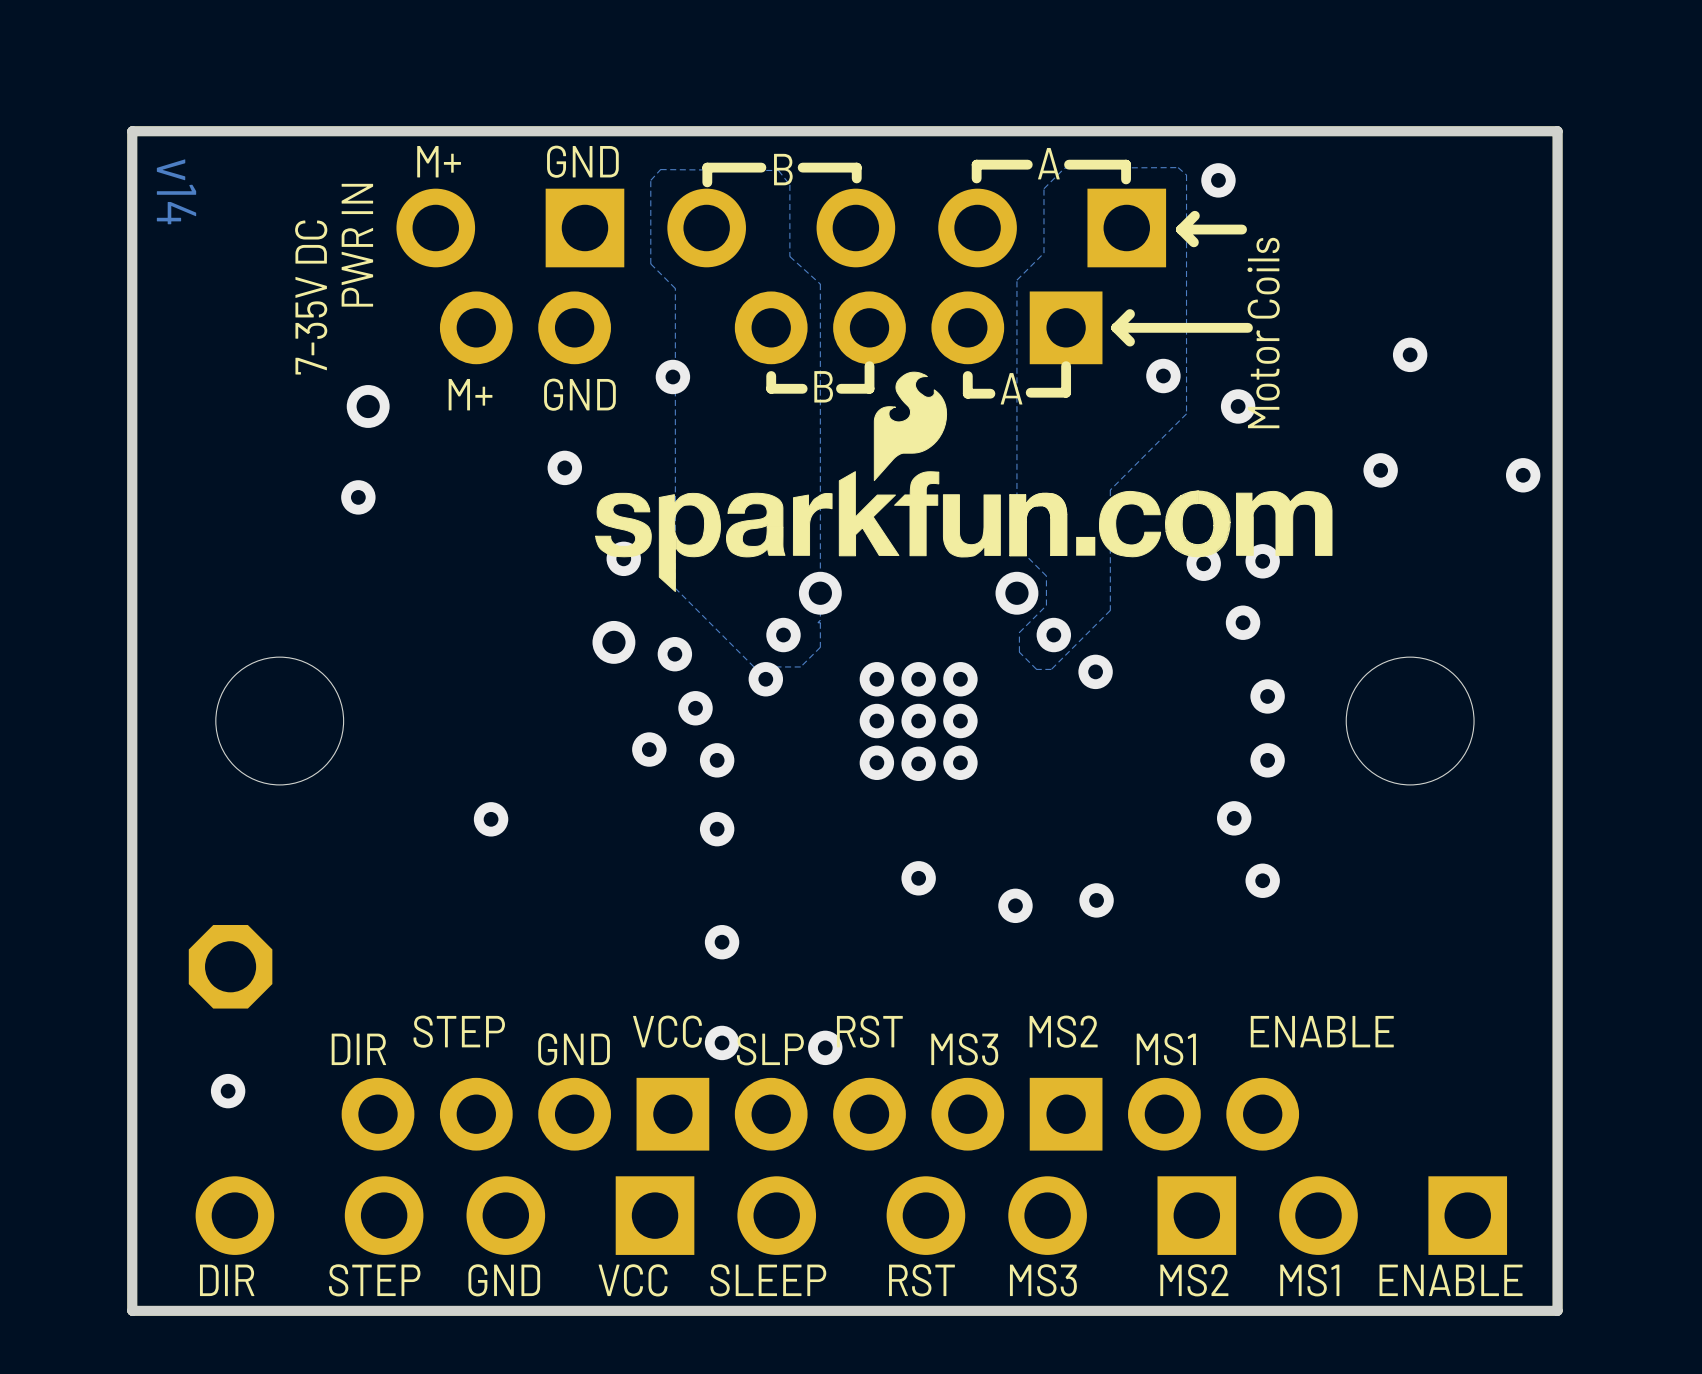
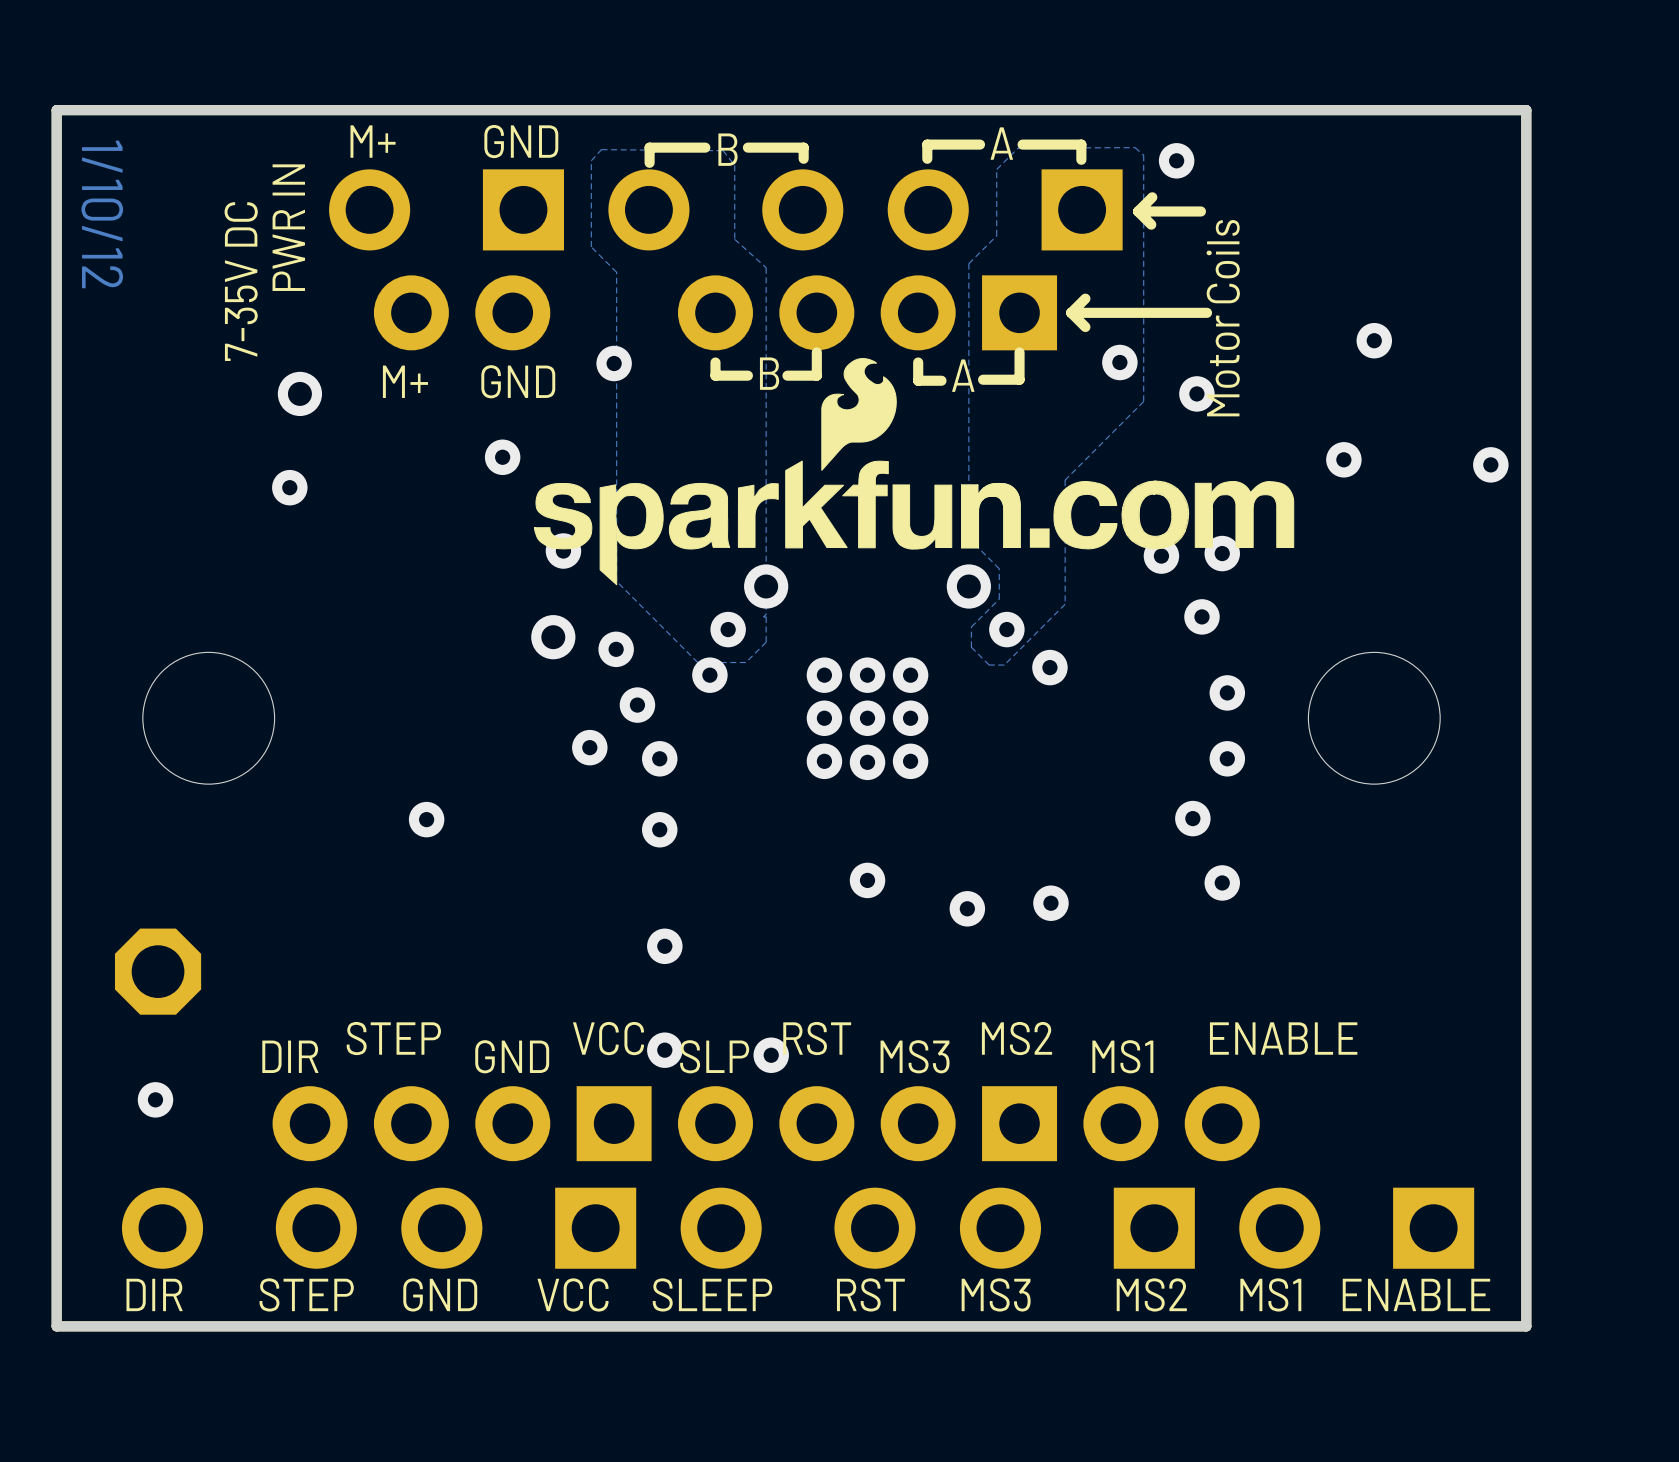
text: v14 (176, 191) -> 1/10/12 (102, 214)

